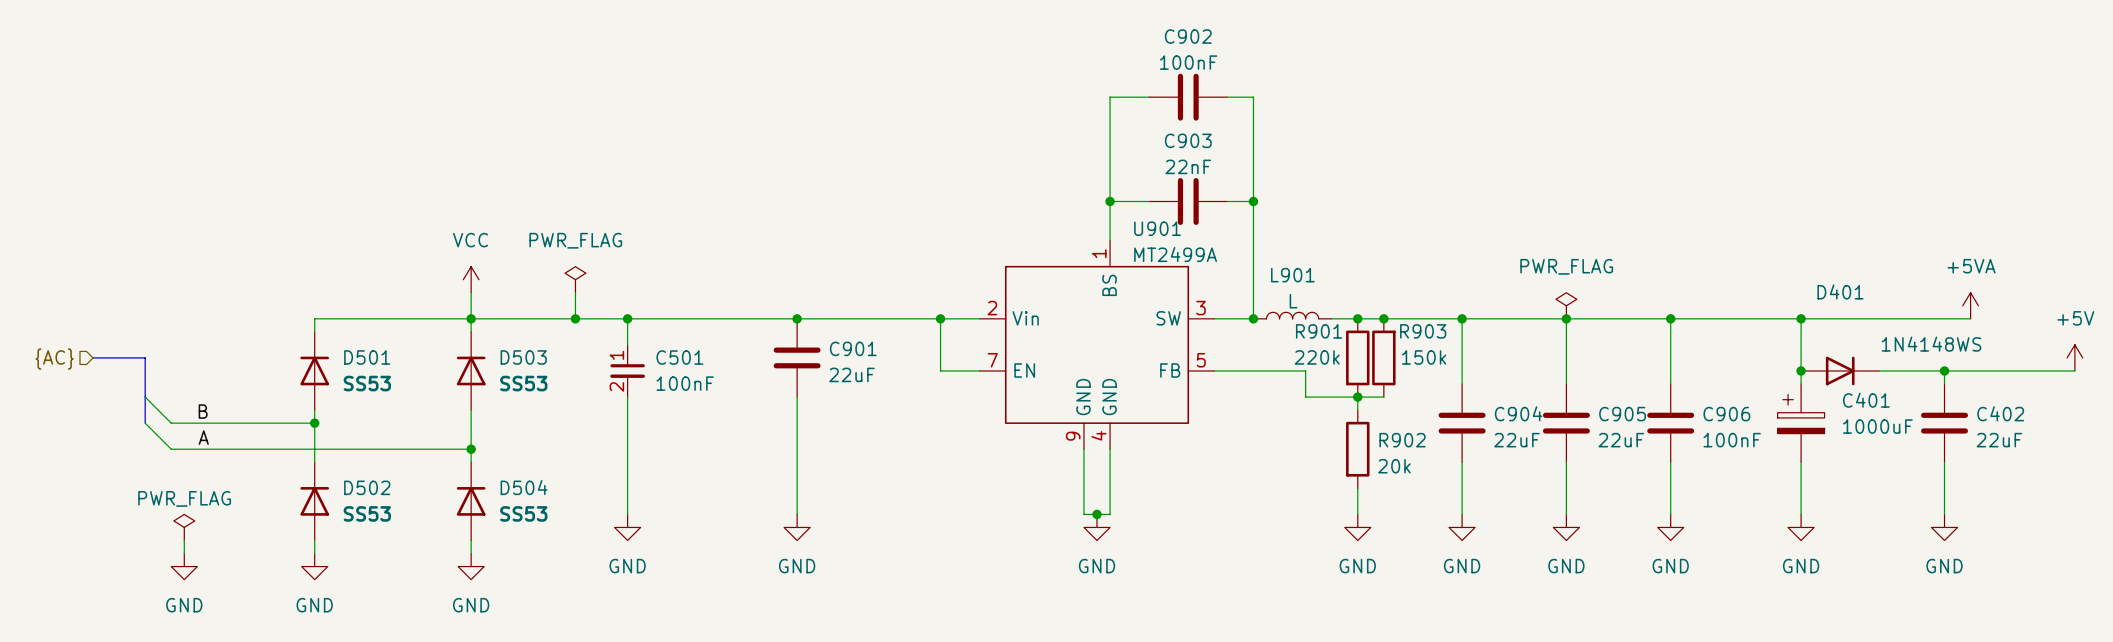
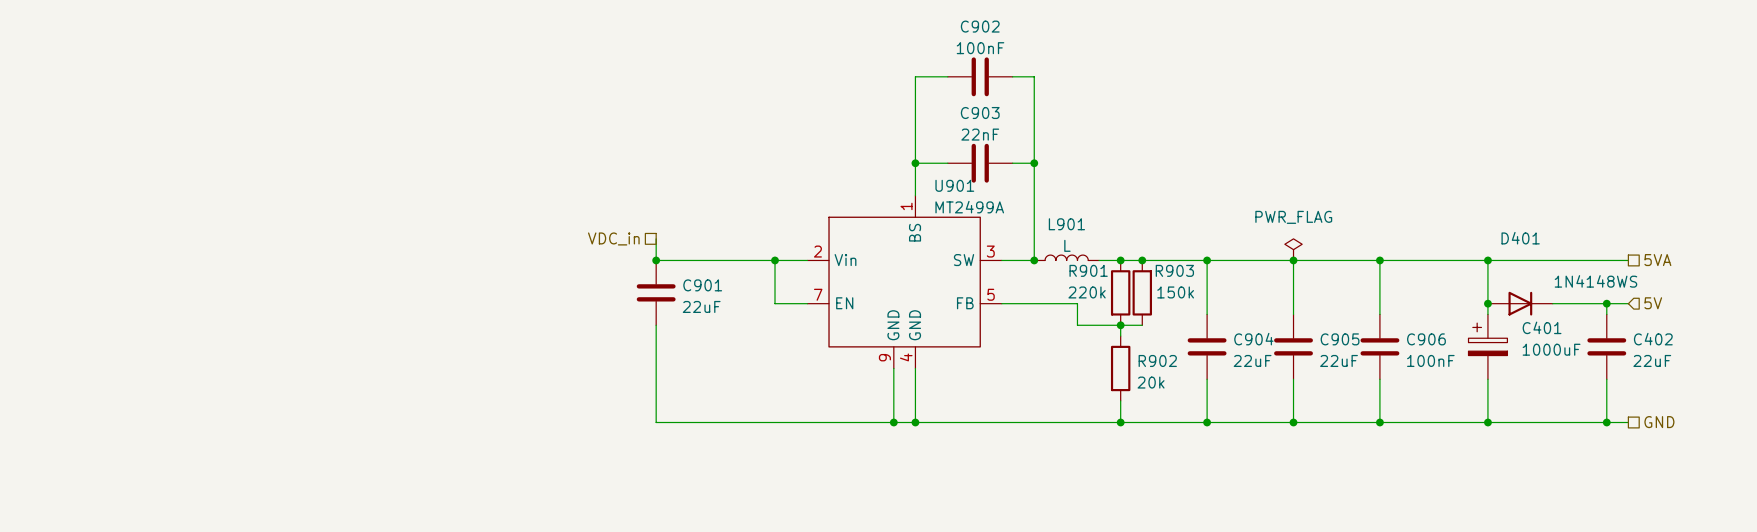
power symbol: VCC (471, 279) -> none
power symbol: PWR_FLAG (575, 279) -> none
wire: (471, 292) (471, 331) -> none
wire: (575, 292) (575, 318) -> none
hierarchical label: none -> VDC_in (613, 238)
power symbol: +5VA (1970, 305) -> none
junction: (471, 318) -> none
junction: (575, 318) -> none
wire: (627, 318) (627, 344) -> none
junction: (627, 318) -> none
wire: (797, 318) (314, 318) (314, 331) -> (656, 260) (656, 238)
hierarchical label: none -> 5VA (1657, 260)
bus: (93, 357) (145, 357) (145, 423) -> none
power symbol: +5V (2074, 357) -> none
hierarchical label: {AC} (54, 359) -> none
D501: SS53 (314, 370) -> none
D503: SS53 (471, 370) -> none
C501: 100nF (627, 370) -> none
wire: (1970, 370) (2074, 370) -> none
hierarchical label: none -> 5V (1653, 303)
wire: (145, 397) (171, 423) (314, 423) -> none
wire: (627, 397) (627, 514) -> none
wire: (314, 410) (314, 462) -> none
wire: (471, 410) (471, 462) -> none
label: B (203, 411) -> none
wire: (145, 423) (171, 449) (471, 449) -> none
junction: (314, 423) -> none
label: A (203, 437) -> none
junction: (471, 449) -> none
D502: SS53 (314, 501) -> none
D504: SS53 (471, 501) -> none
hierarchical label: none -> GND (1659, 422)
wire: none -> (656, 422) (893, 422)
junction: none -> (893, 422)
junction: (1097, 514) -> none
wire: none -> (915, 422) (1628, 422)
junction: none -> (915, 422)
junction: none -> (1120, 422)
junction: none -> (1207, 422)
junction: none -> (1293, 422)
junction: none -> (1379, 422)
junction: none -> (1487, 422)
junction: none -> (1606, 422)
power symbol: PWR_FLAG (184, 527) -> none
power symbol: GND (627, 527) -> none
power symbol: GND (797, 527) -> none
power symbol: GND (1097, 527) -> none
power symbol: GND (1357, 527) -> none
power symbol: GND (1462, 527) -> none
power symbol: GND (1566, 527) -> none
power symbol: GND (1670, 527) -> none
power symbol: GND (1801, 527) -> none
power symbol: GND (1944, 527) -> none
wire: (184, 540) (184, 553) -> none
wire: (314, 540) (314, 553) -> none
wire: (471, 540) (471, 553) -> none
power symbol: GND (184, 566) -> none
power symbol: GND (314, 566) -> none
power symbol: GND (471, 566) -> none

